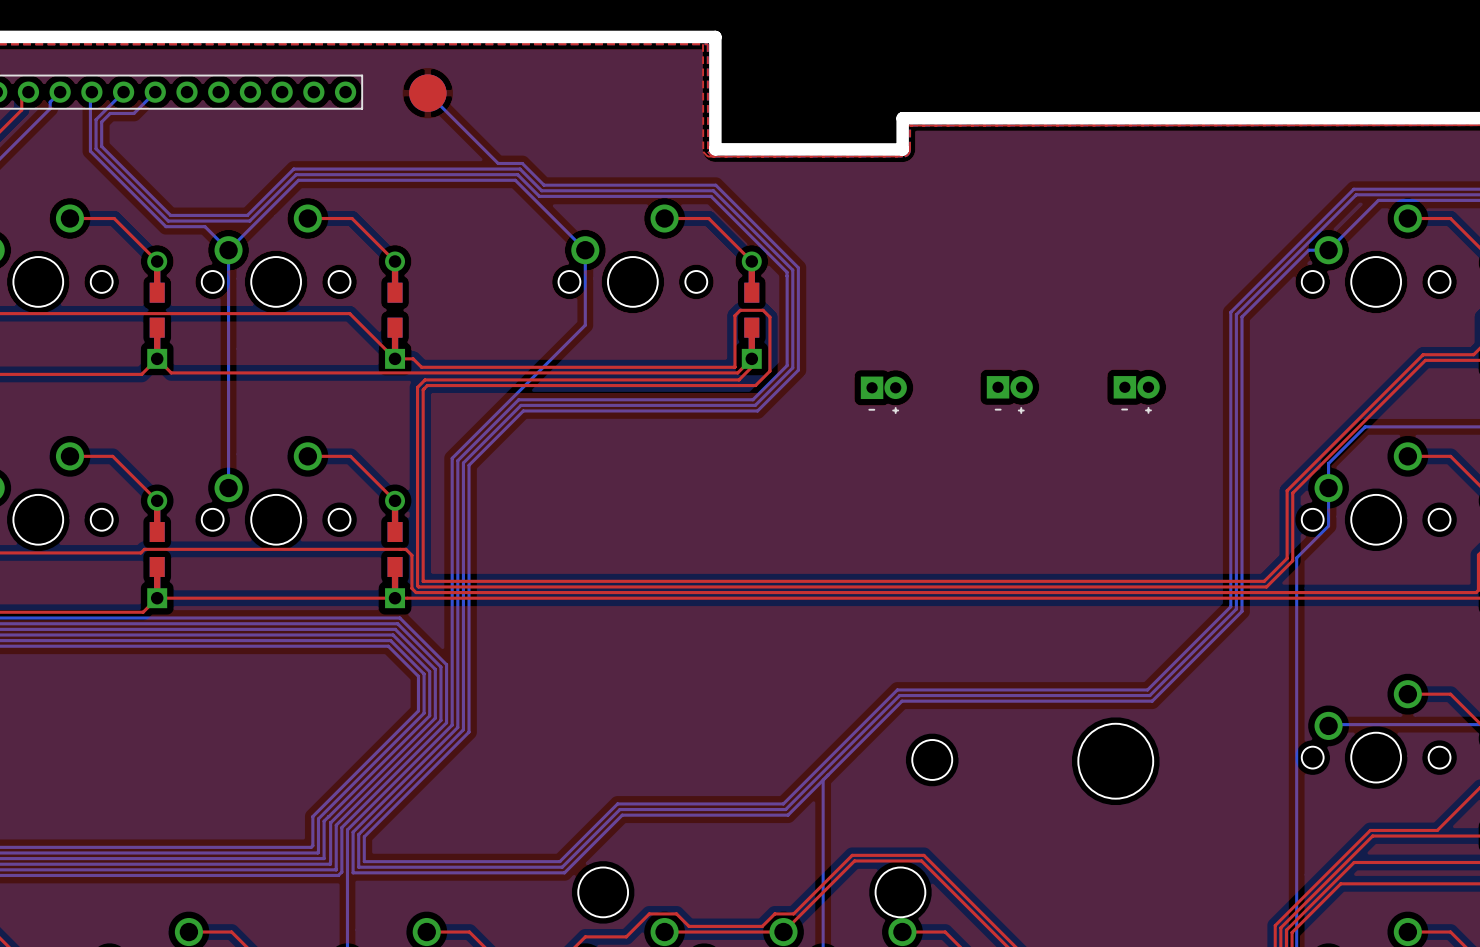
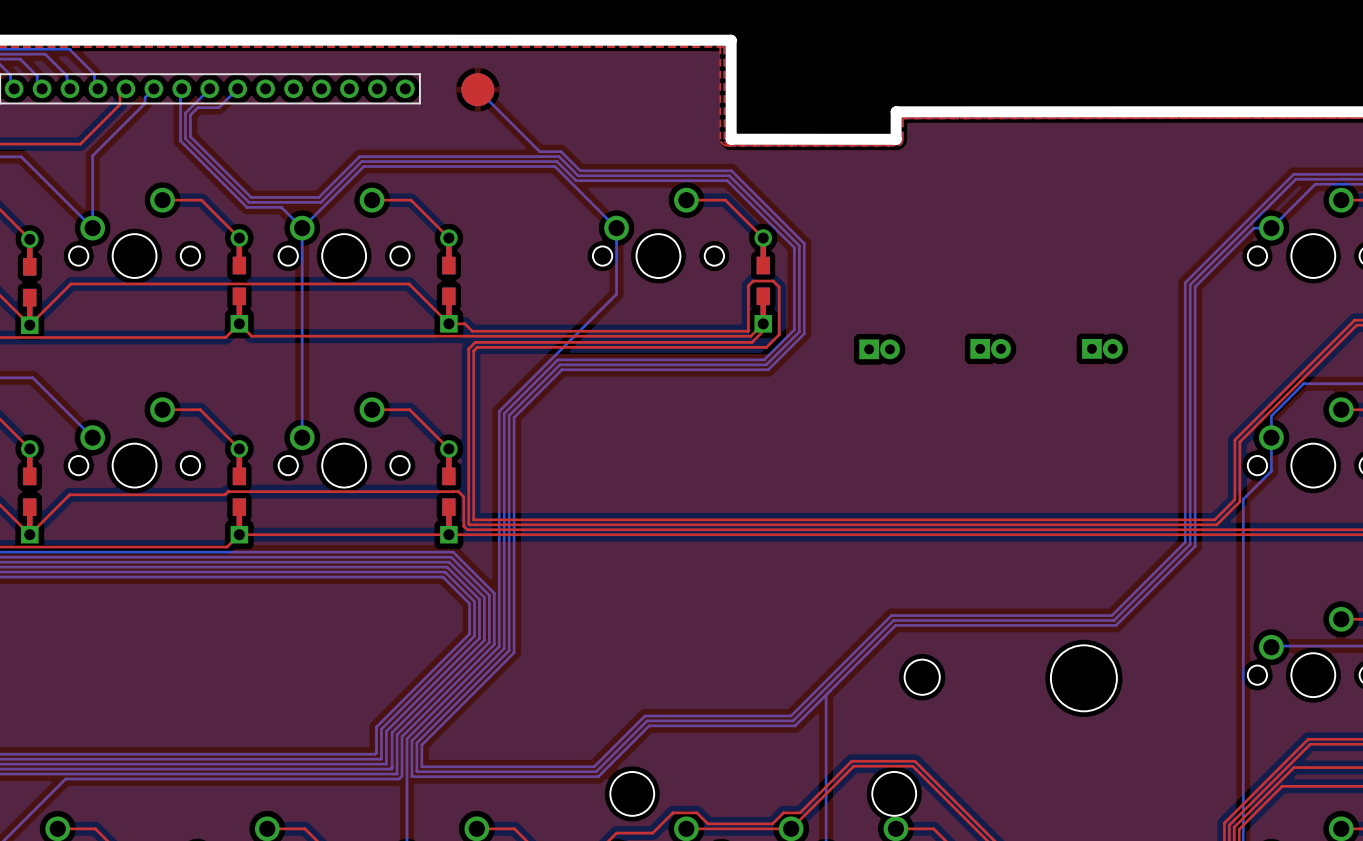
line: (1148, 407) (1148, 412) -> none
line: (895, 408) (895, 413) -> none
line: (1021, 408) (1021, 413) -> none
line: (869, 409) (874, 409) -> none
line: (995, 409) (1000, 409) -> none
line: (1122, 409) (1127, 409) -> none
line: (893, 410) (898, 410) -> none
line: (1018, 410) (1023, 410) -> none
line: (1145, 410) (1150, 410) -> none

